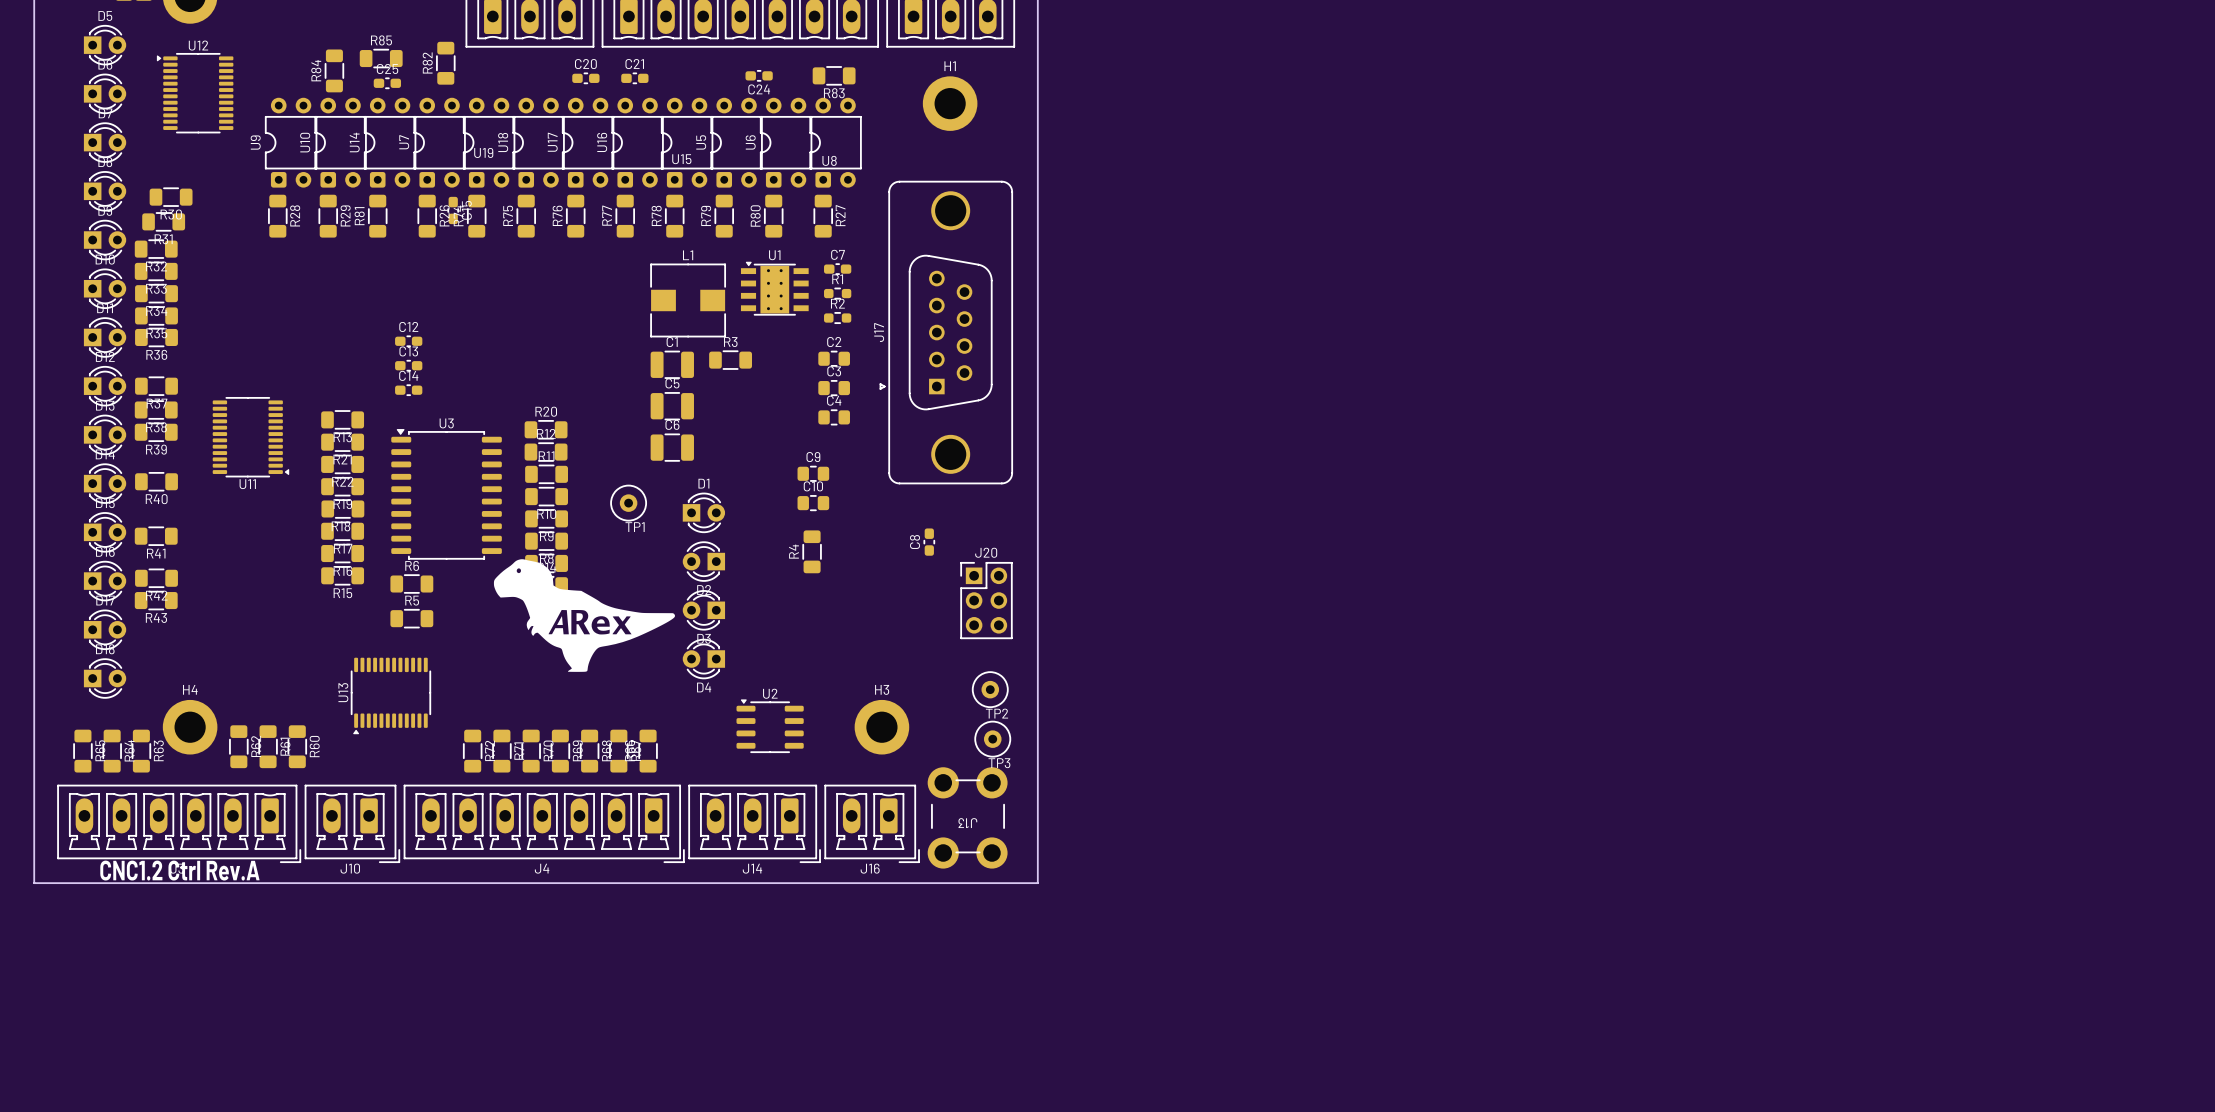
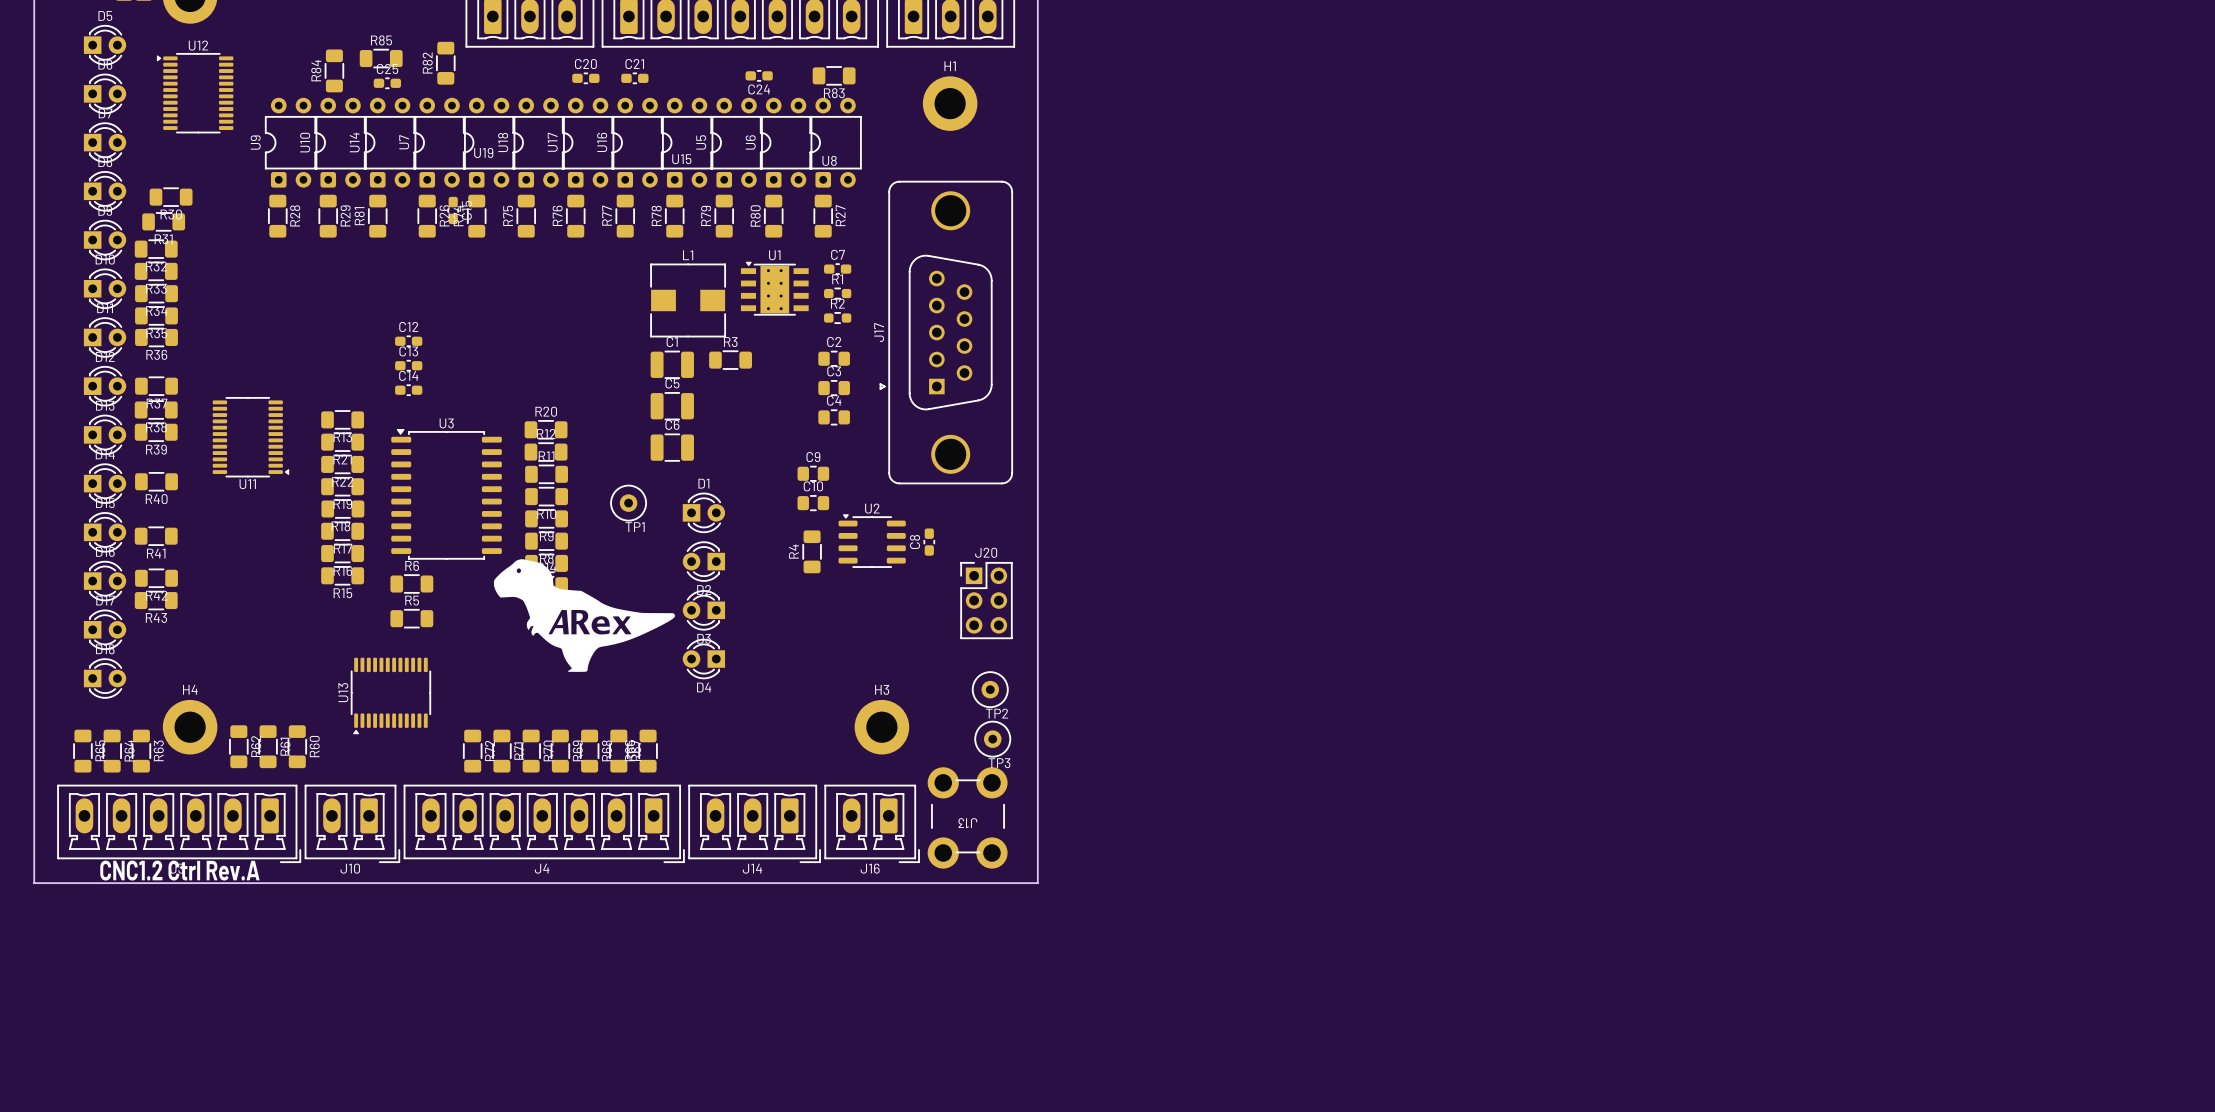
U2 position: (770, 726) -> (872, 540)

